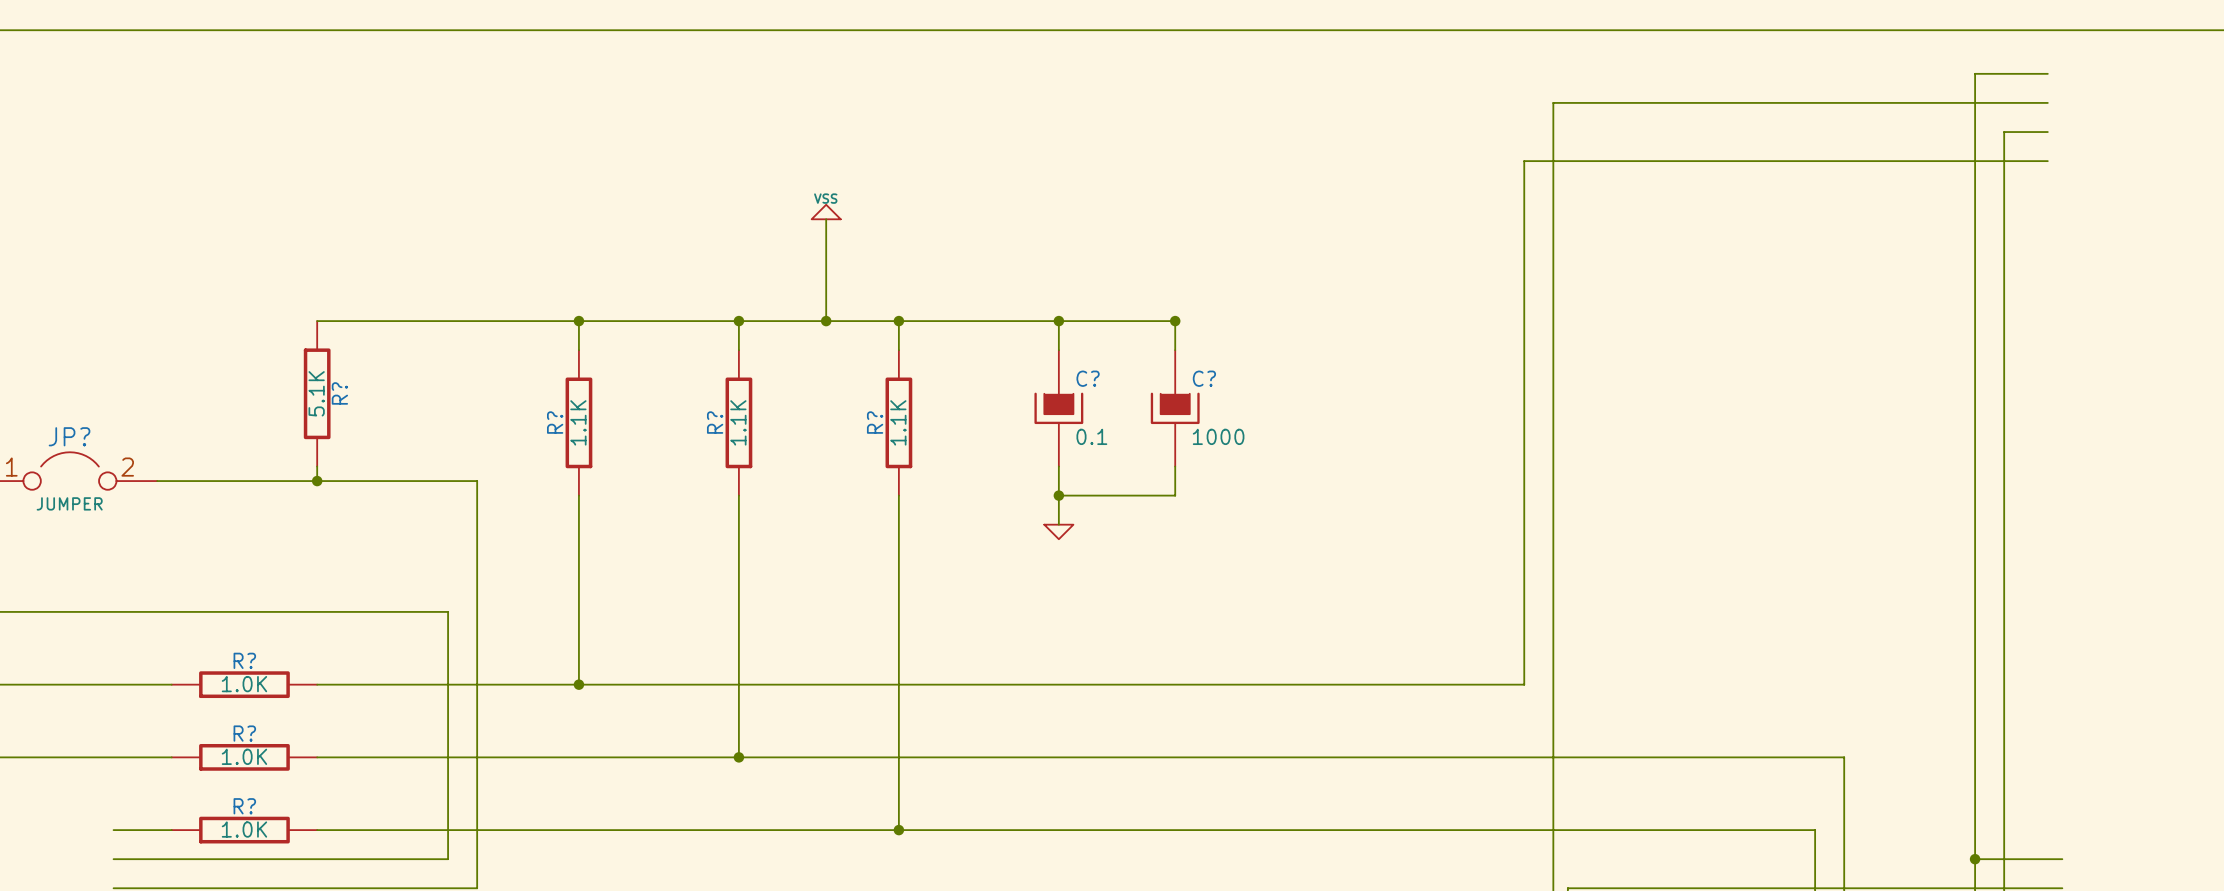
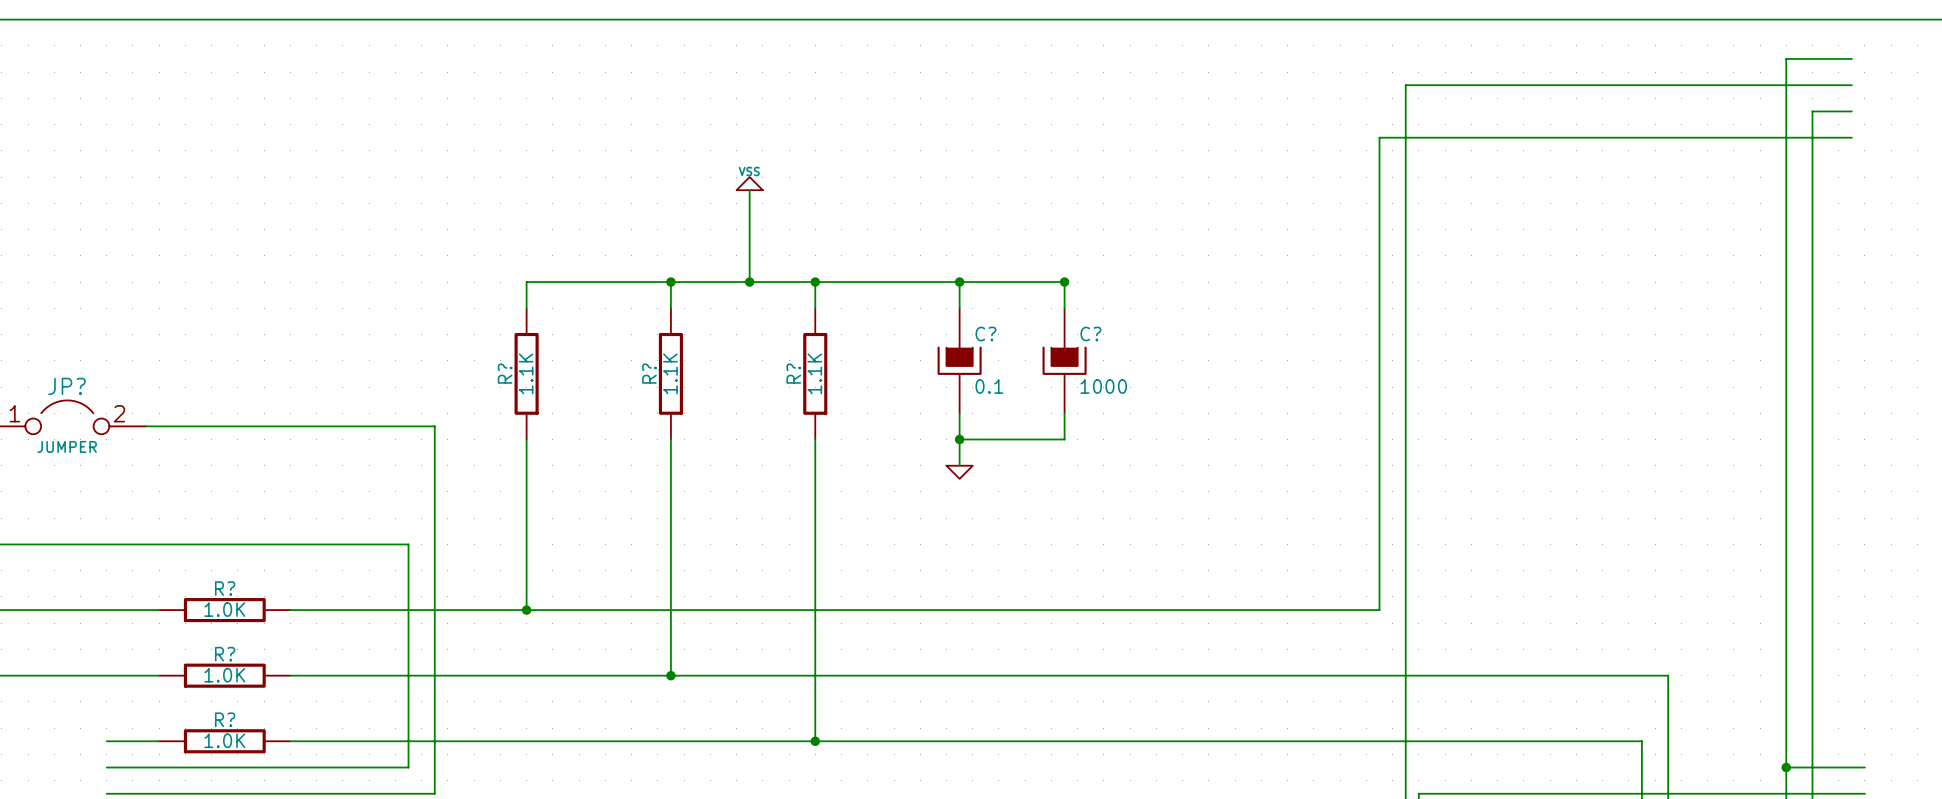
wire: (317, 321) (578, 321) -> none
junction: (578, 321) -> none
R?: 5.1K (317, 393) -> none
wire: (317, 466) (317, 481) -> none
junction: (317, 481) -> none

